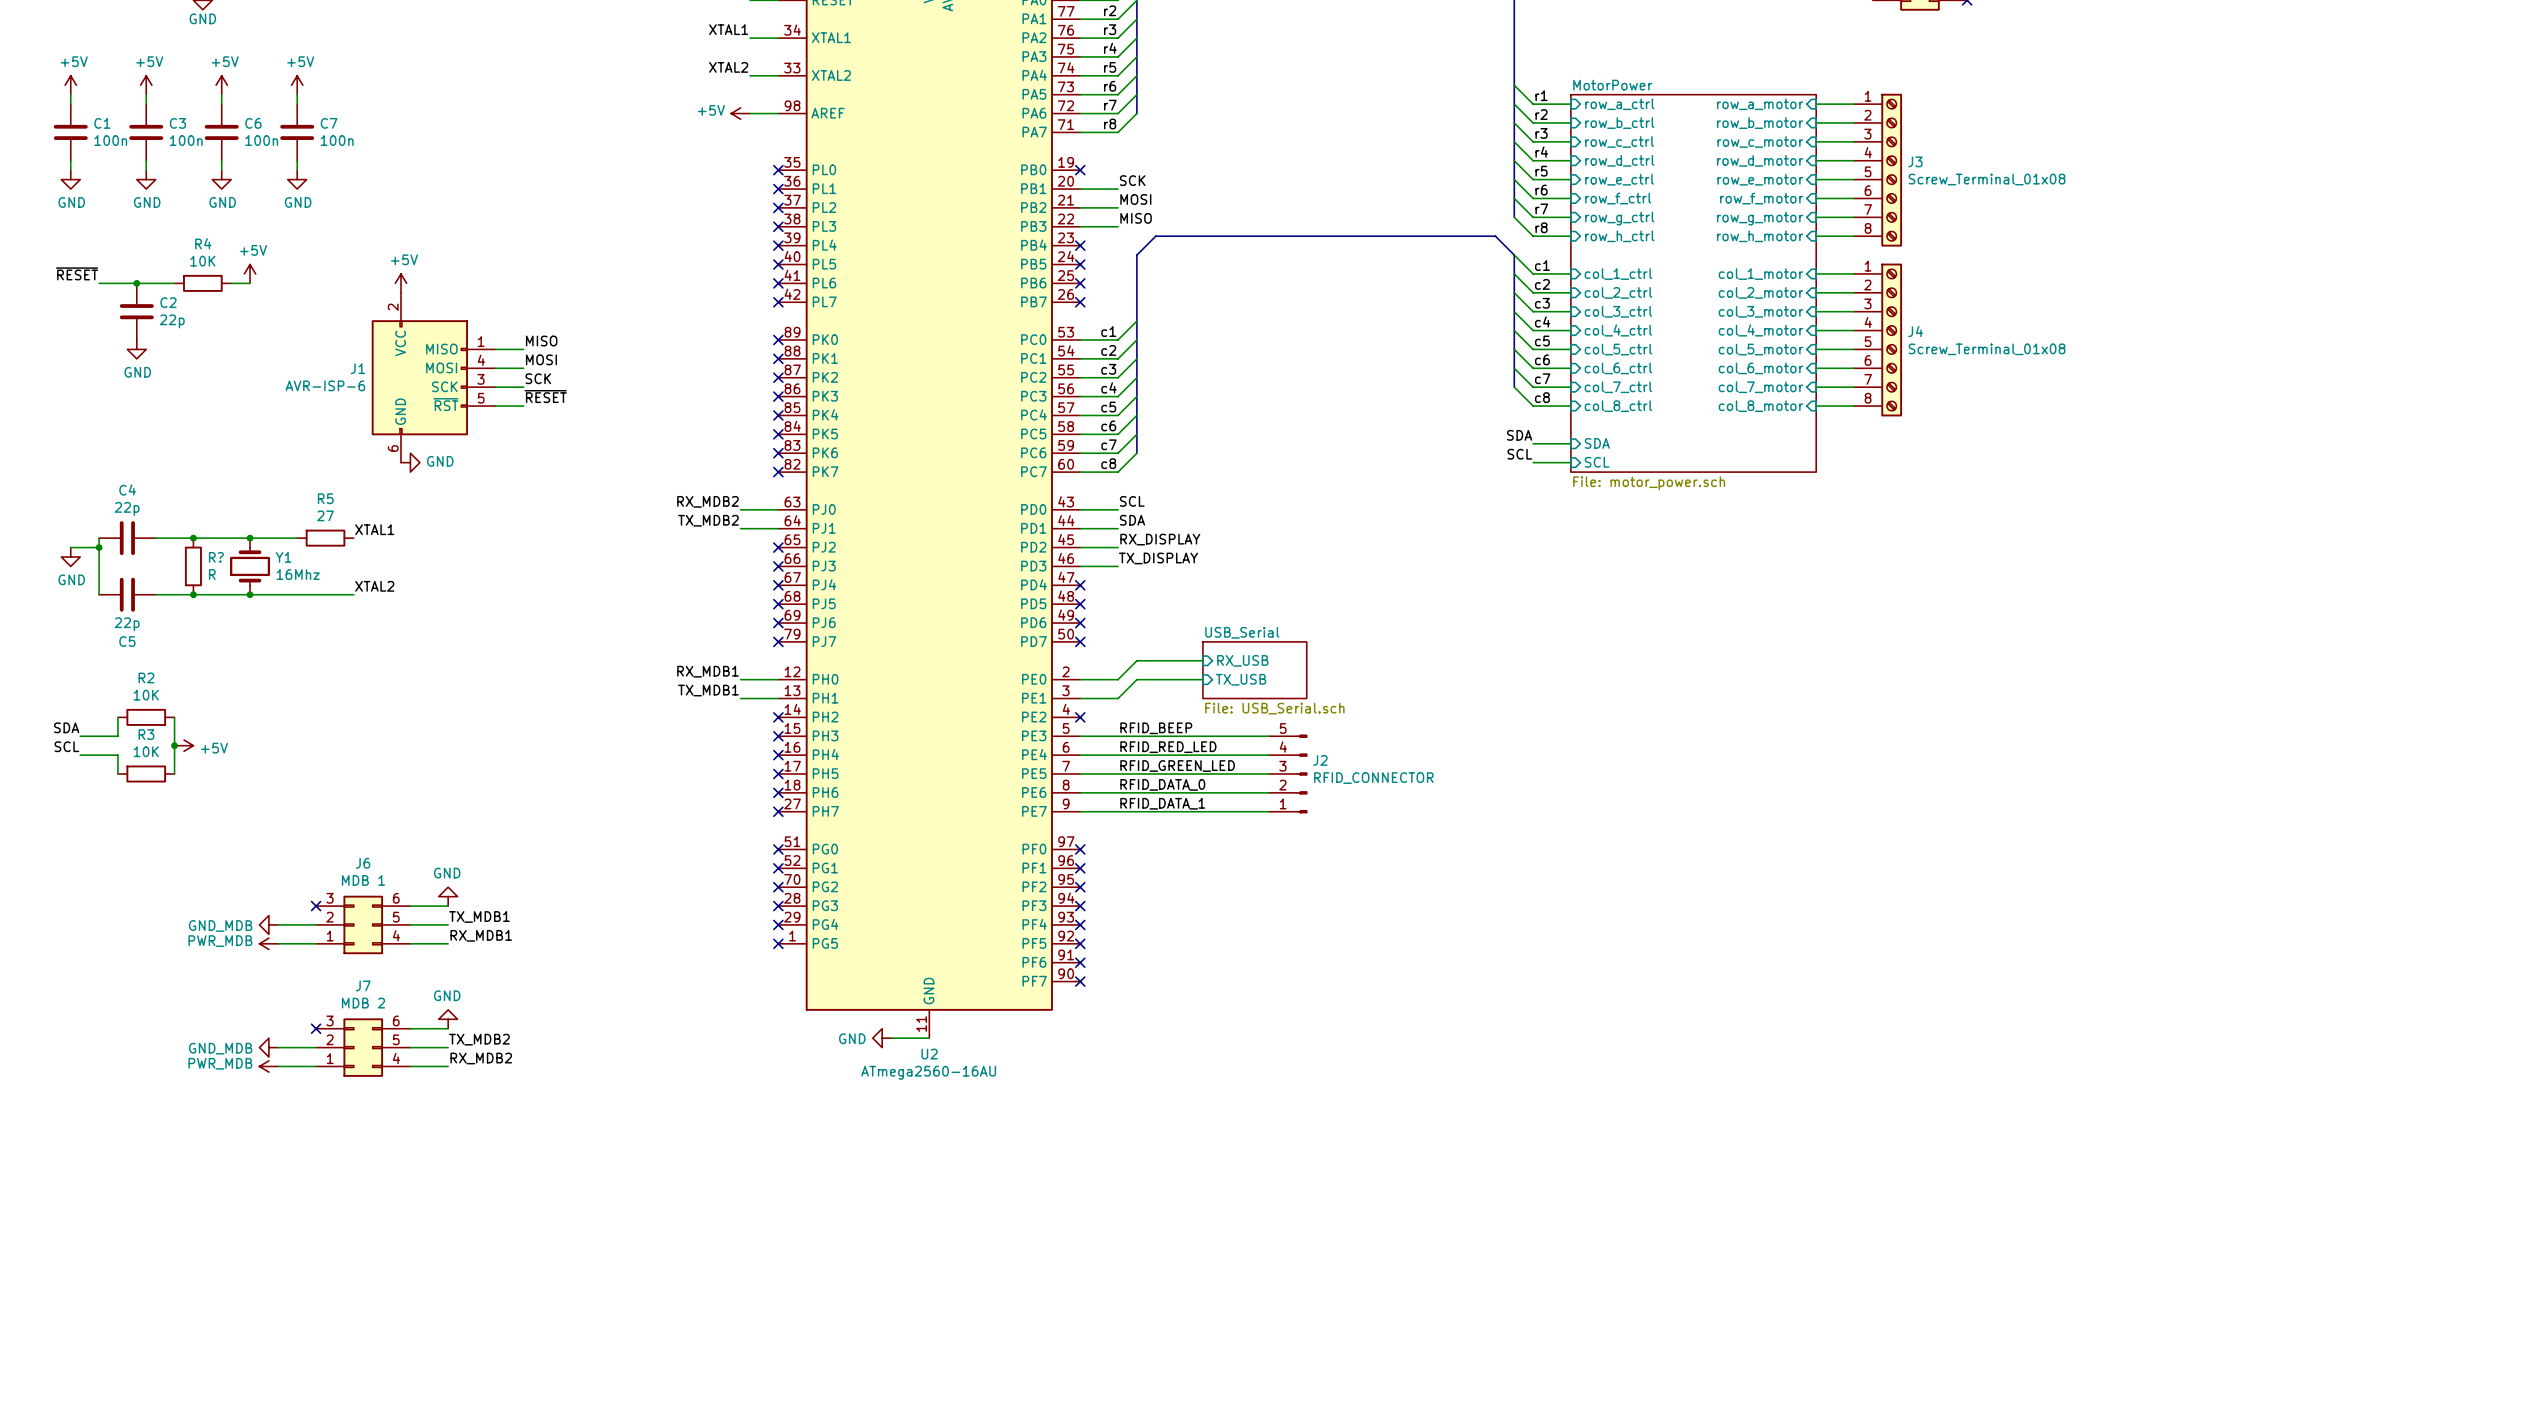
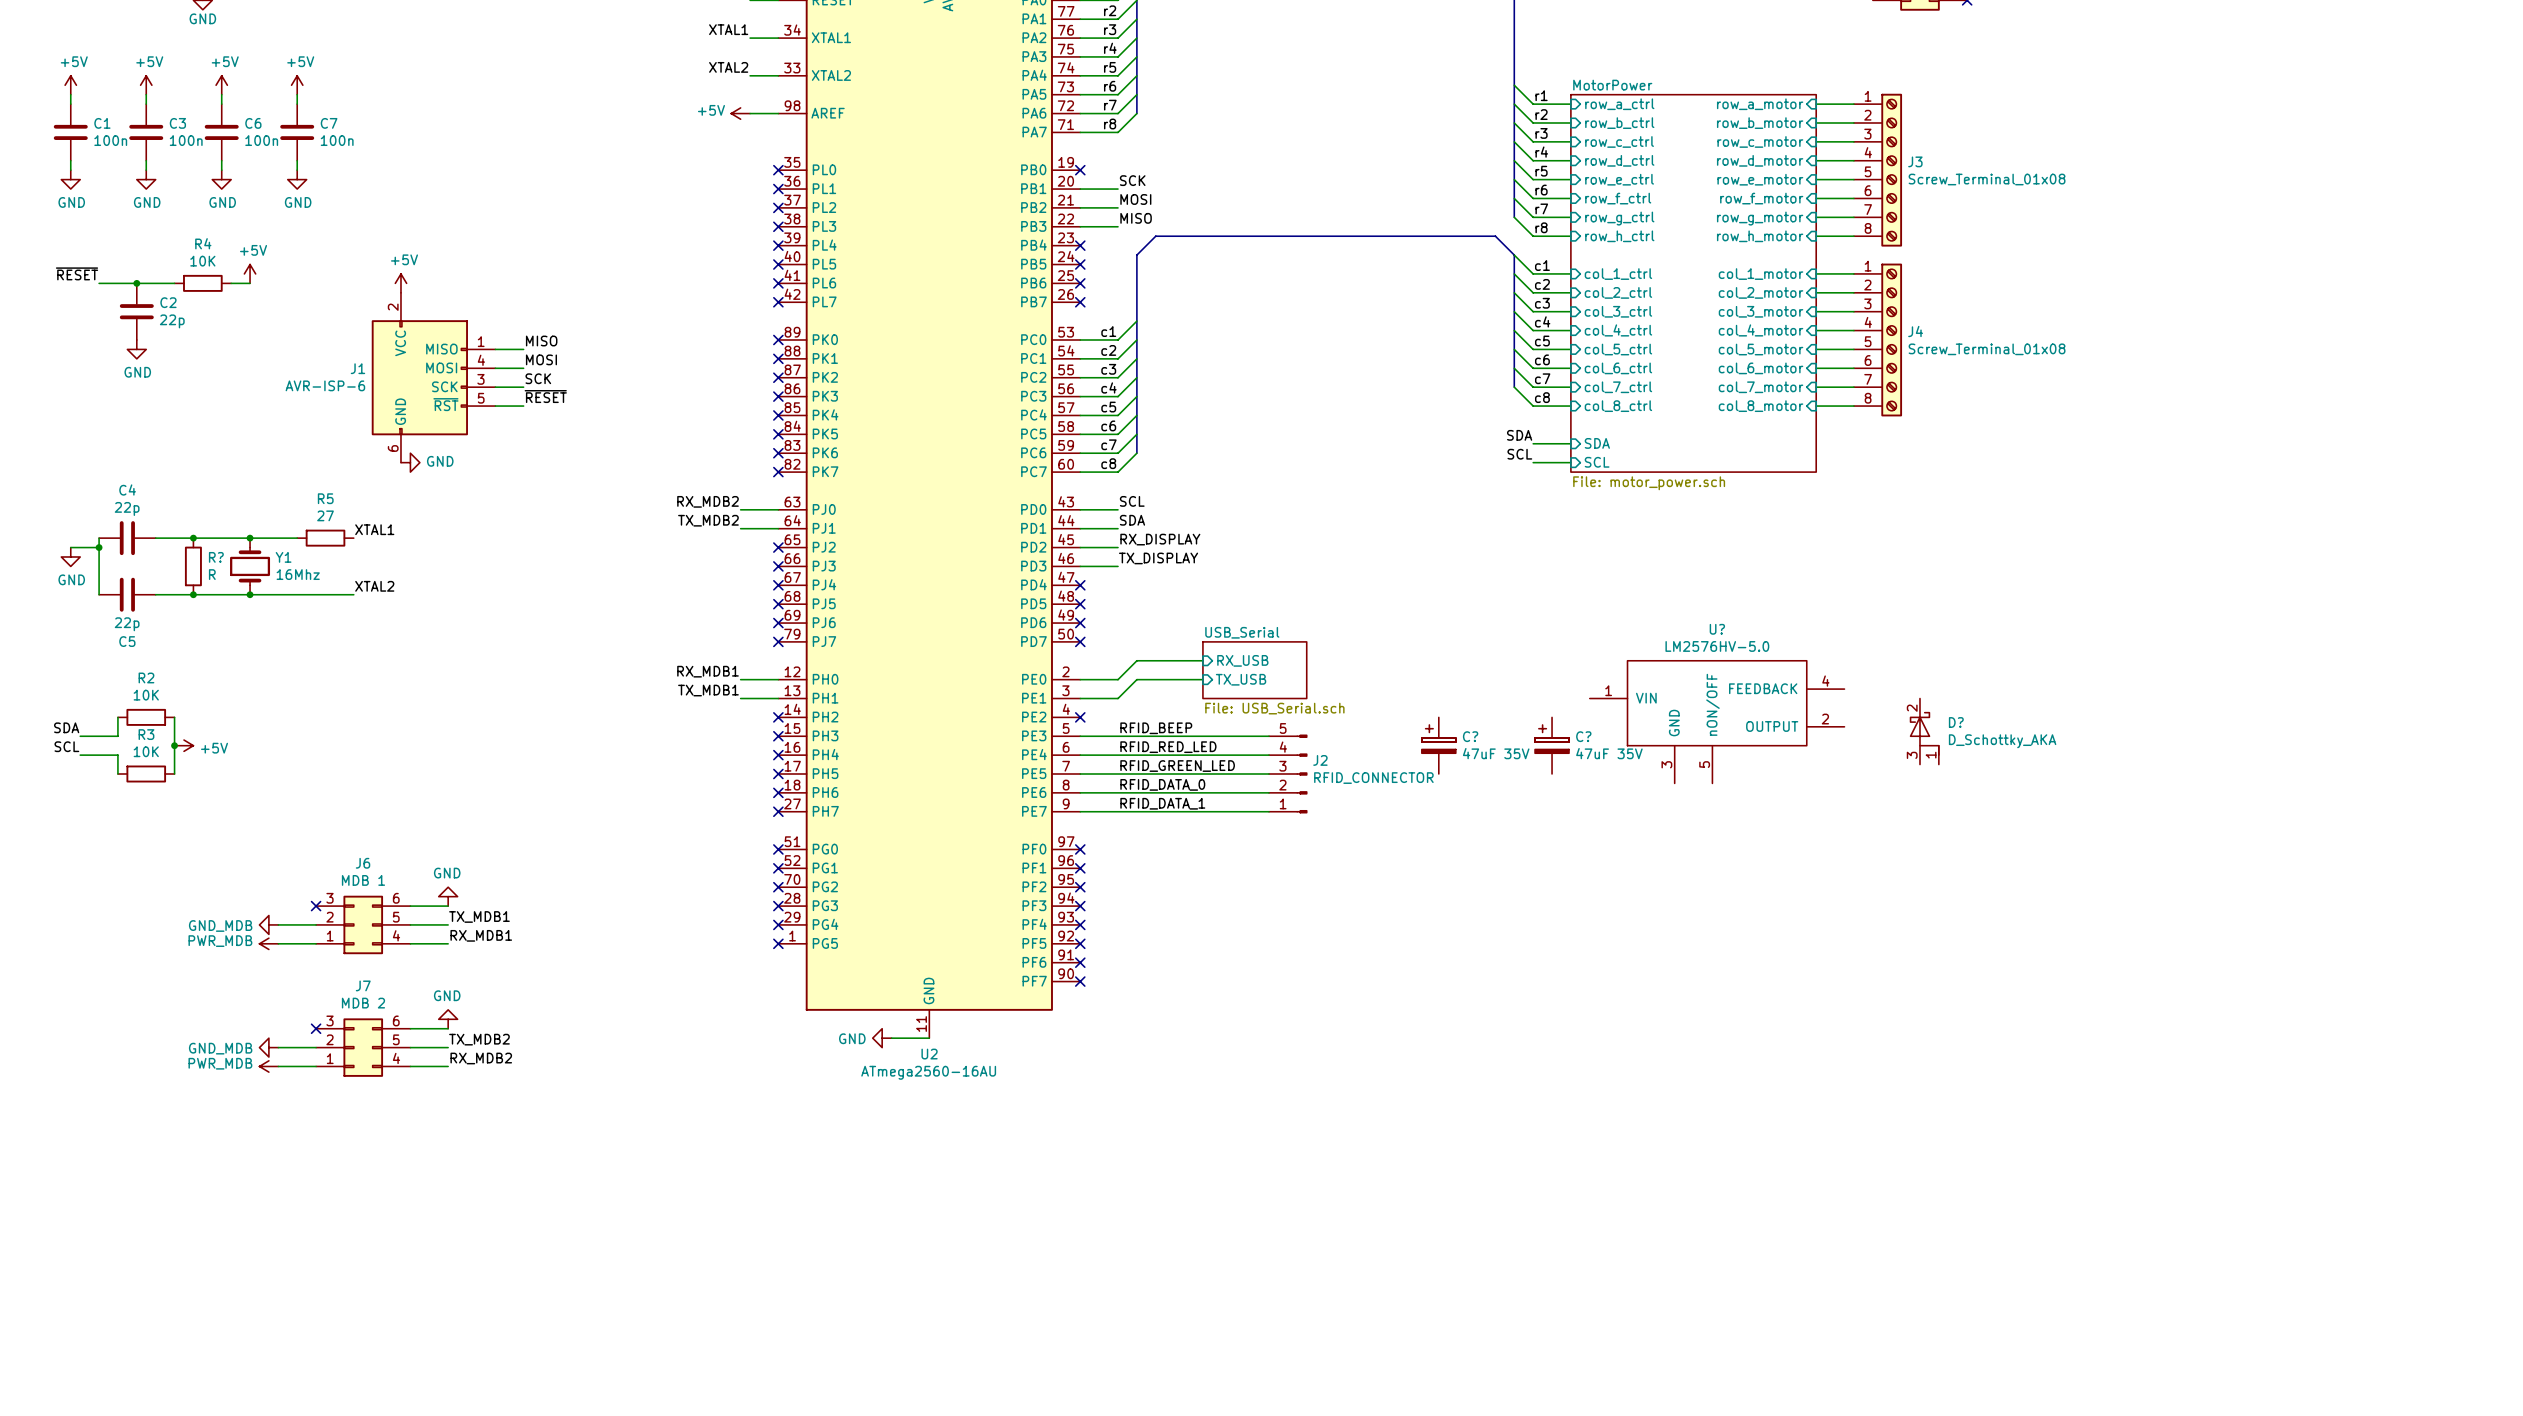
U?: none -> LM2576HV-5.0 (1717, 722)
D?: none -> D_Schottky_AKA (1924, 731)
C?: none -> 47uF 35V (1438, 745)
C?: none -> 47uF 35V (1552, 745)

